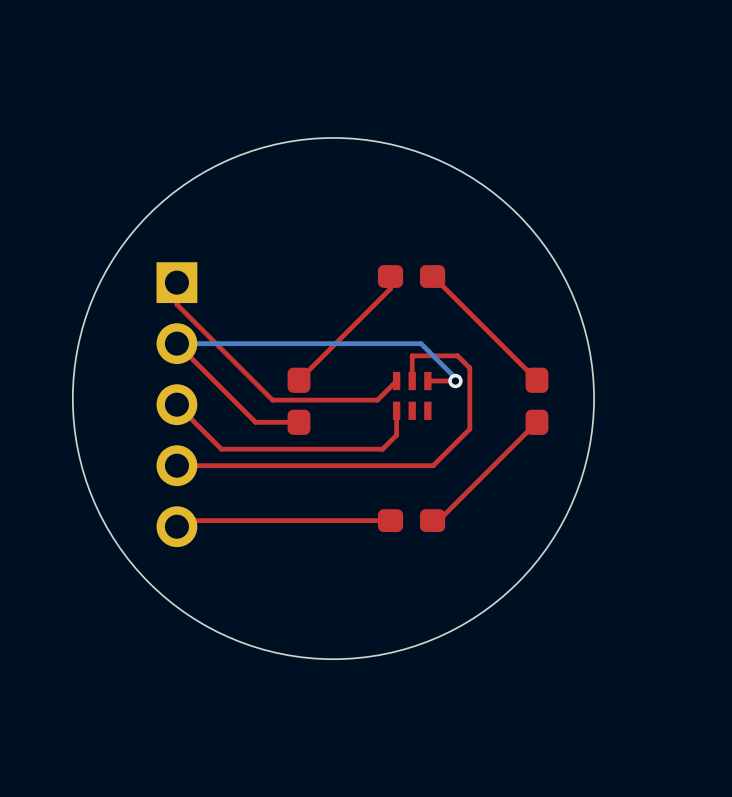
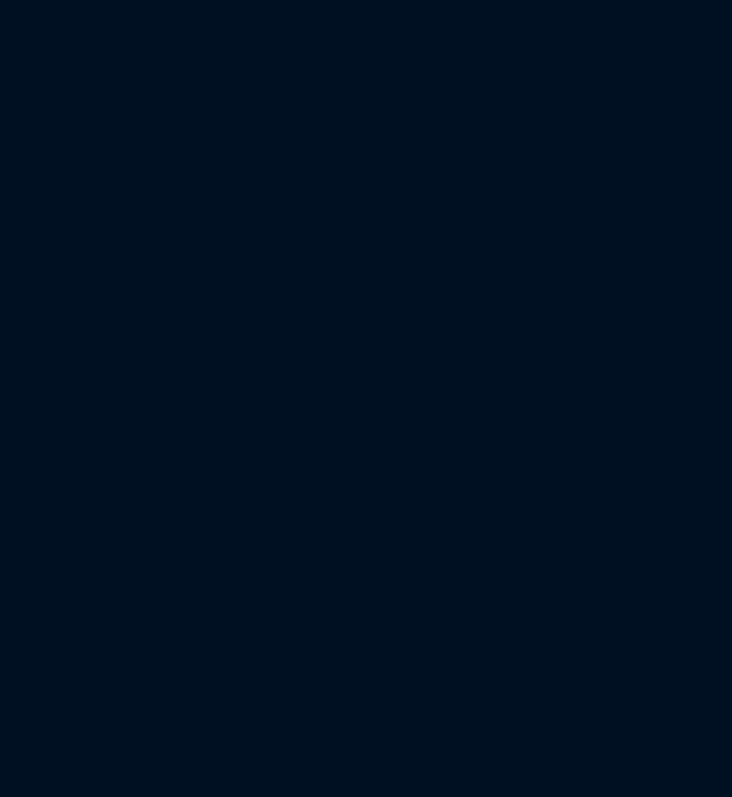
round board edge: [72, 137, 595, 660] -> none
top track: (390, 276) (390, 288) (298, 380) -> none
part: (411, 276) -> none
top track: (432, 276) (536, 380) -> none
top track: (176, 282) (176, 304) (272, 400) (377, 400) (396, 381) -> none
top track: (176, 343) (255, 422) (298, 422) -> none
bottom track: (176, 343) (421, 343) (455, 378) (455, 381) -> none
top track: (457, 380) (427, 381) -> none
top track: (412, 381) (412, 355) (457, 355) (469, 368) (469, 429) (433, 465) (176, 465) -> none
via: (455, 381) -> none
part: (412, 395) -> none
part: (298, 401) -> none
part: (536, 401) -> none
top track: (176, 404) (221, 449) (382, 449) (396, 435) (396, 410) -> none
part: (176, 404) -> none
top track: (536, 422) (438, 520) (432, 520) -> none
top track: (390, 520) (183, 520) (176, 526) -> none
part: (411, 520) -> none

